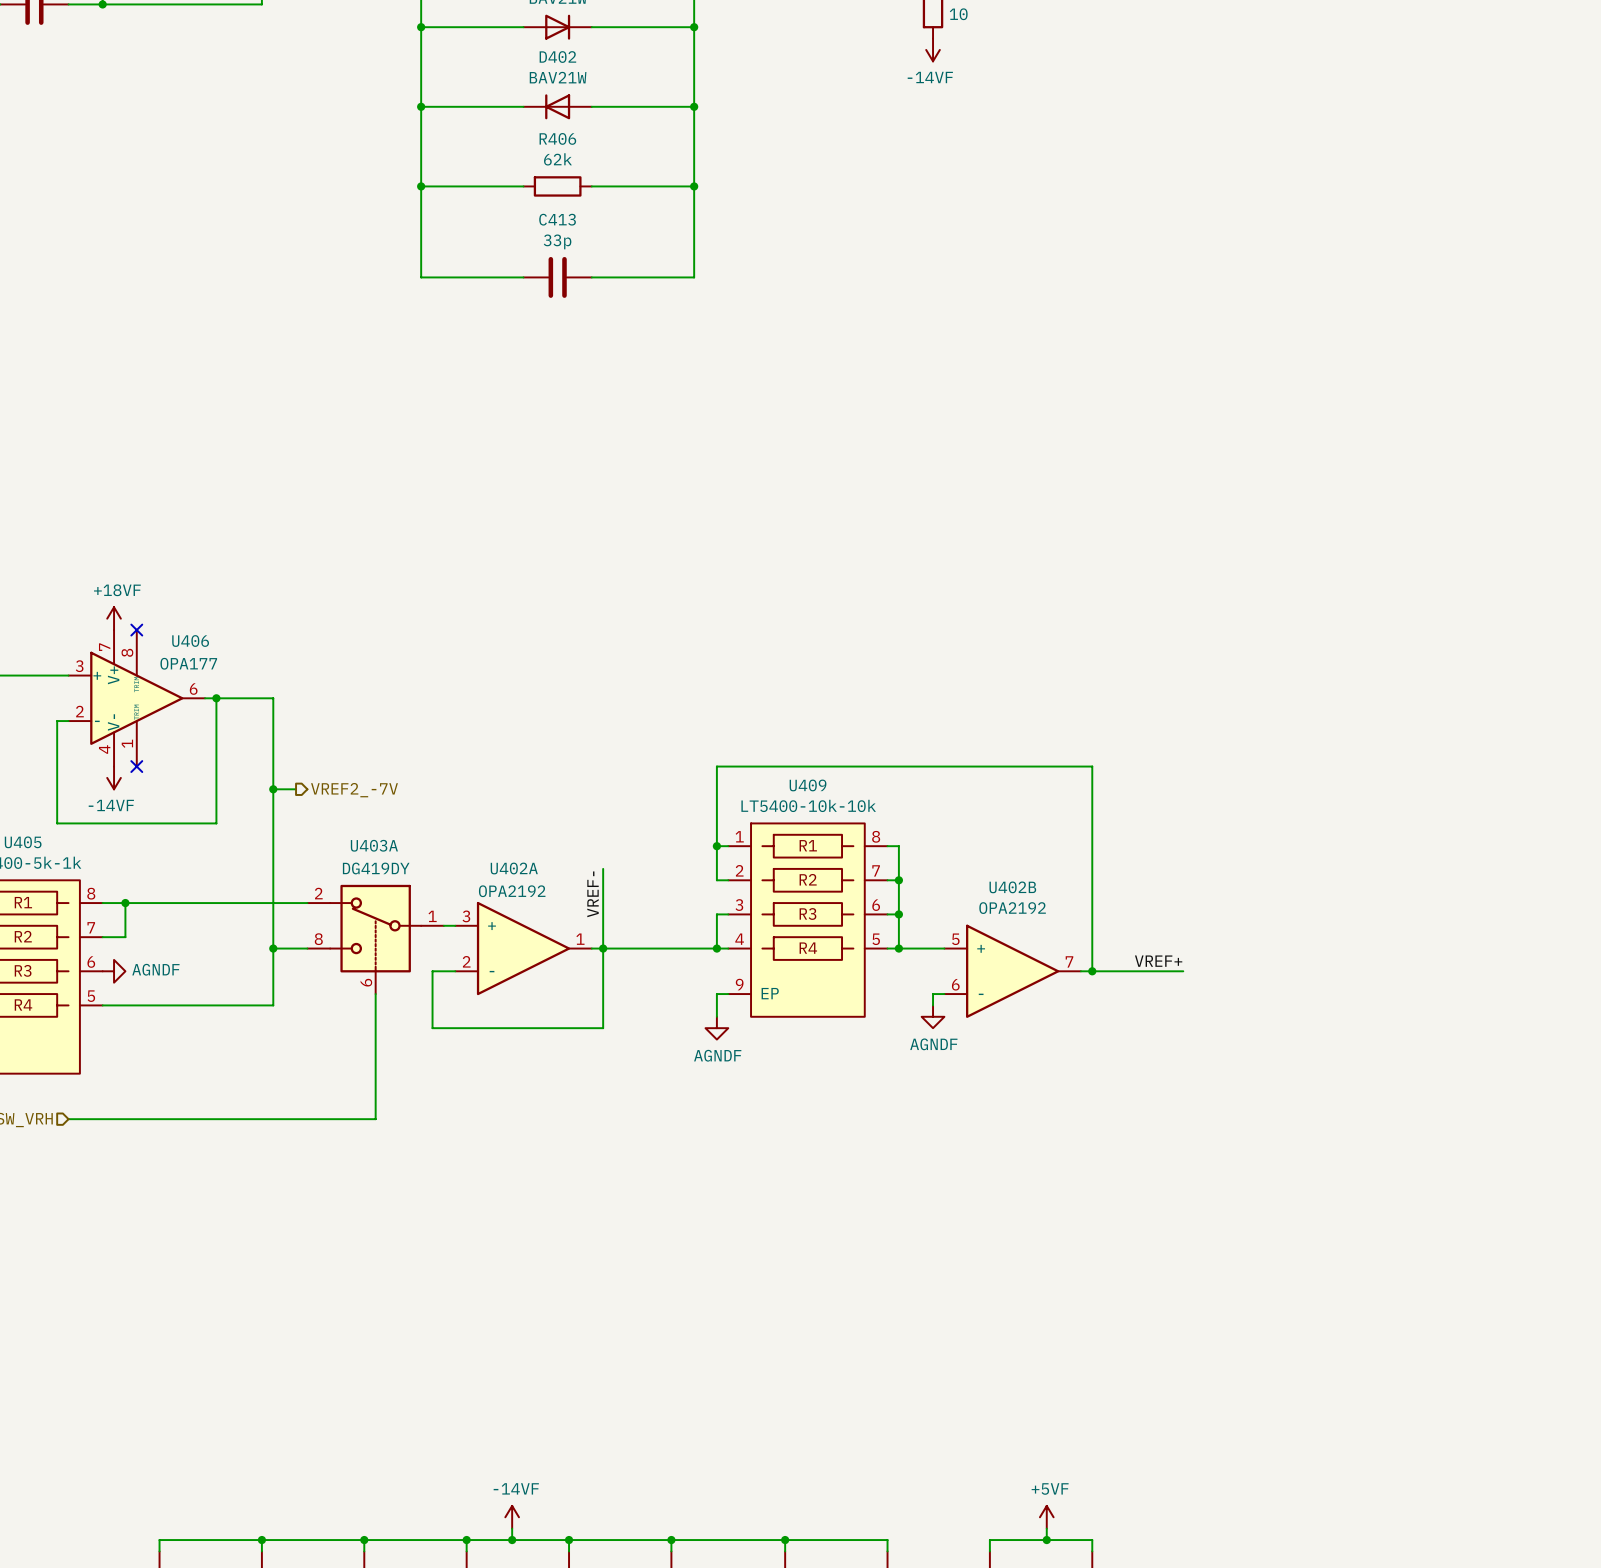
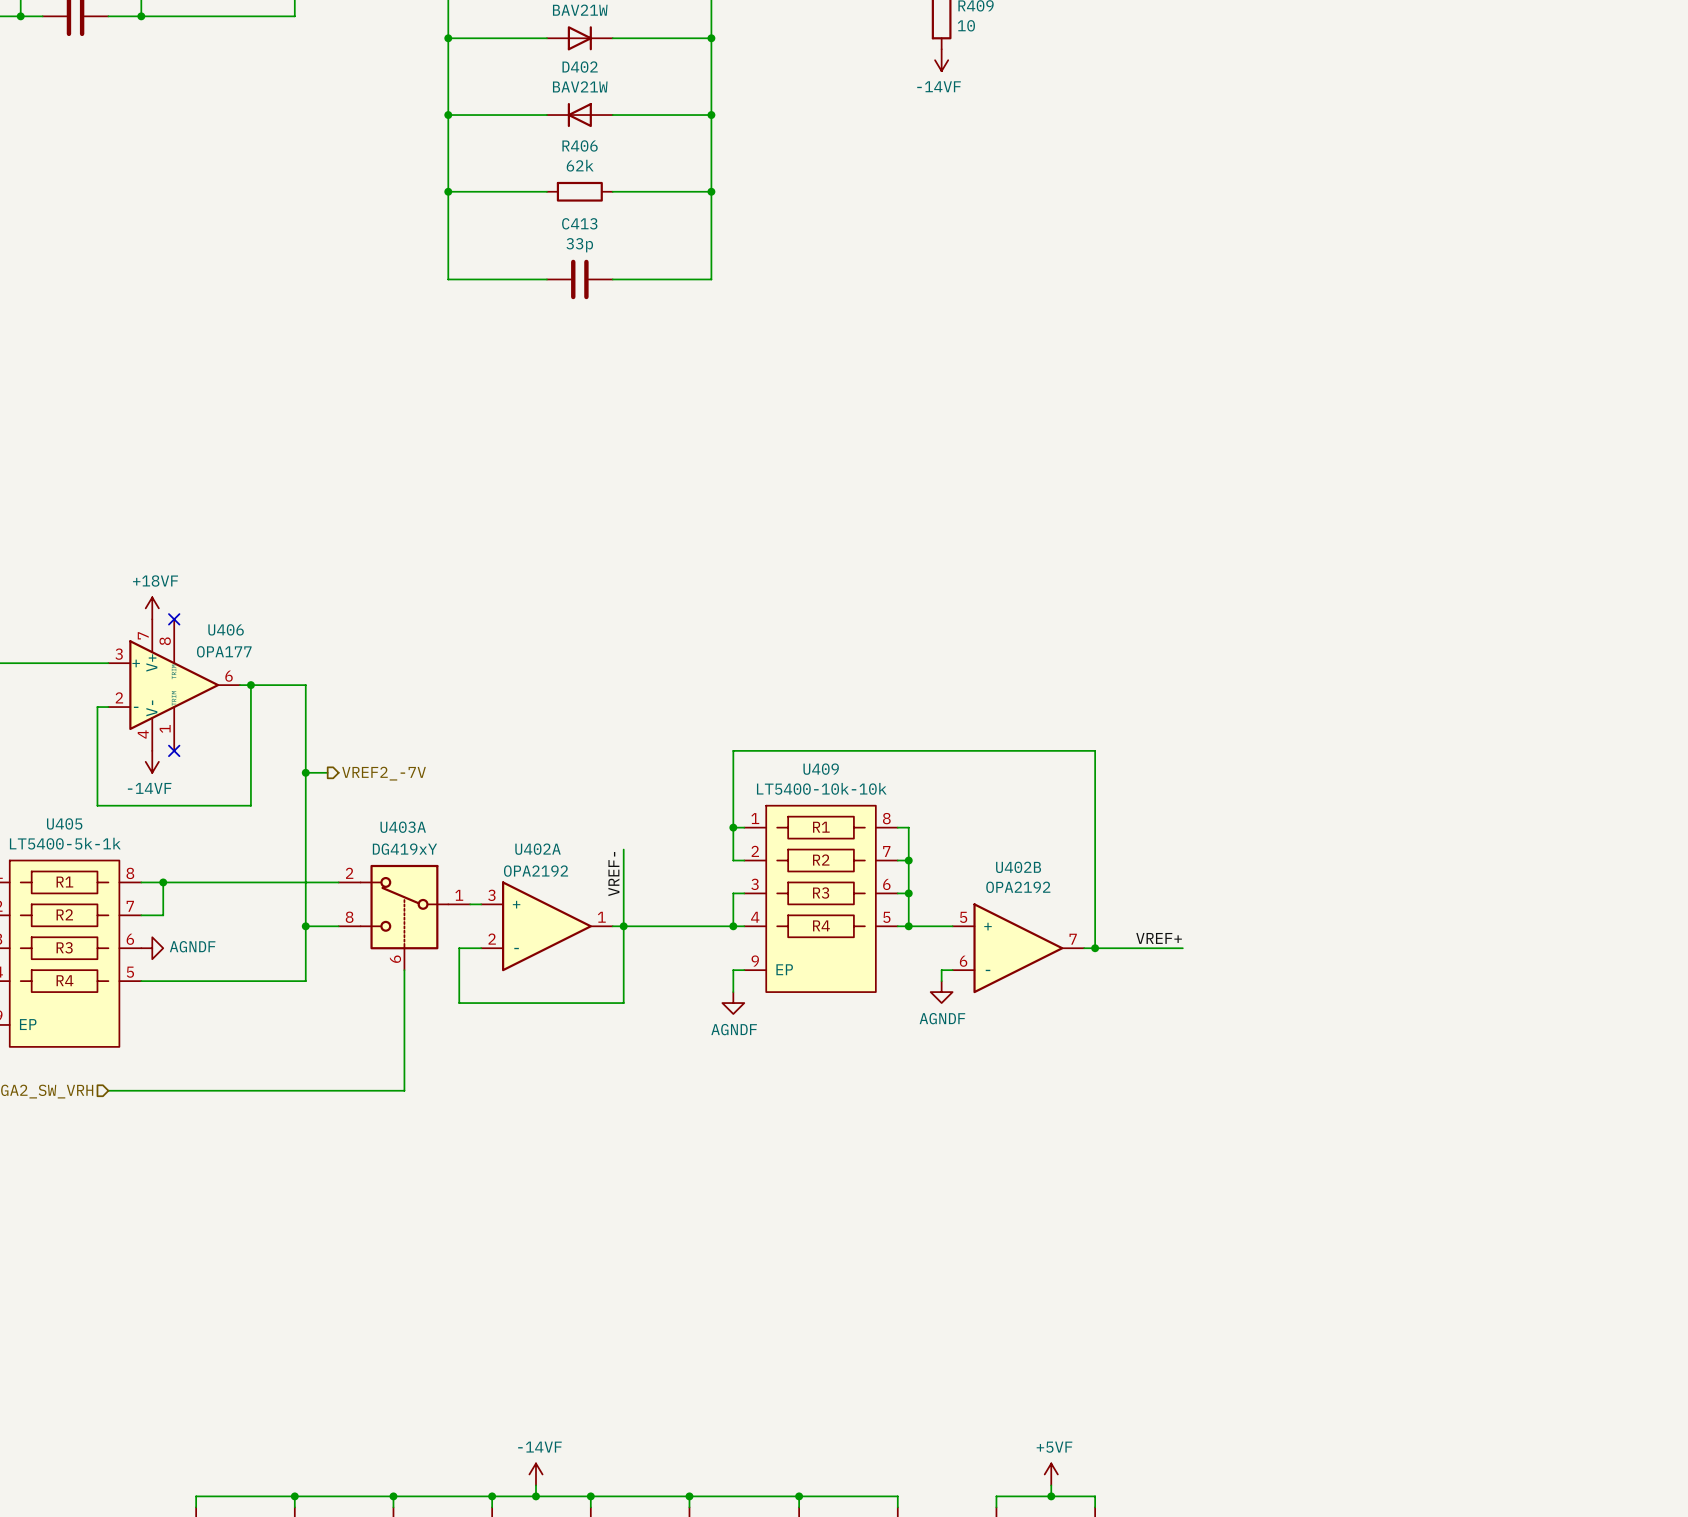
U403A value: DG419DY (376, 868) -> DG419xY (404, 849)

